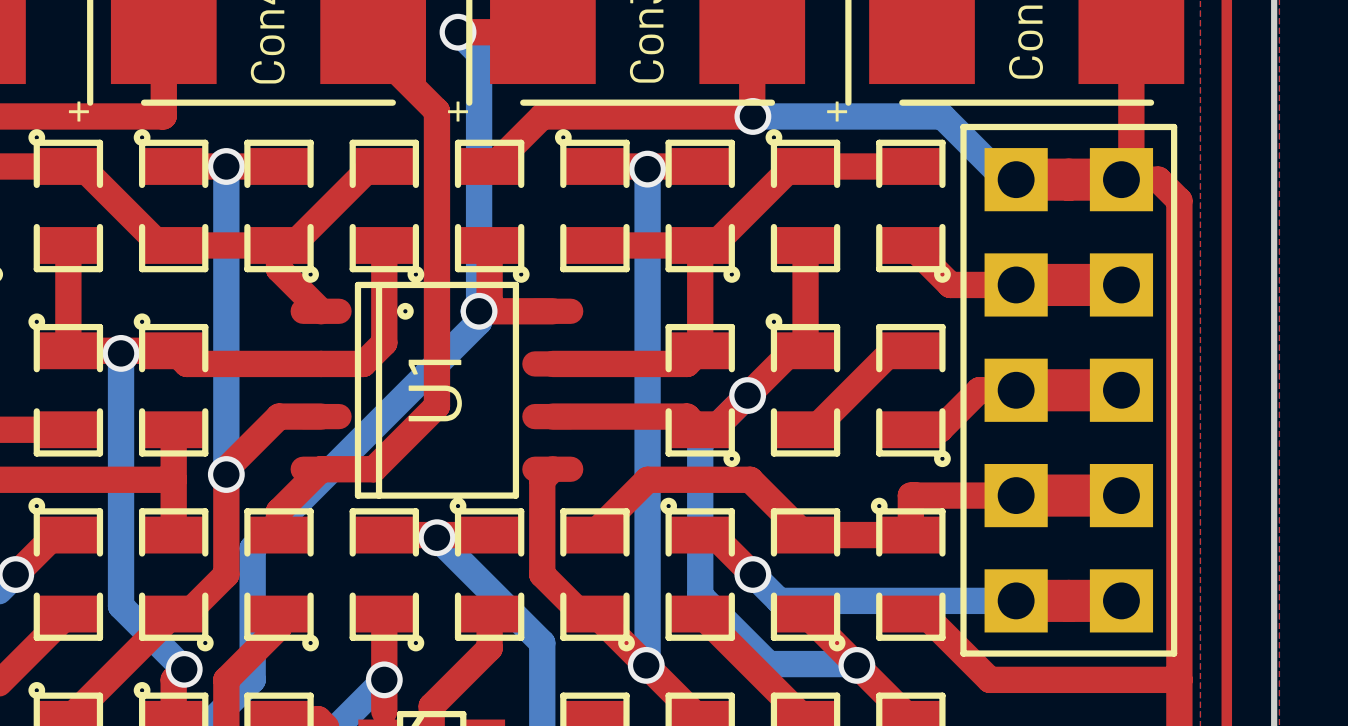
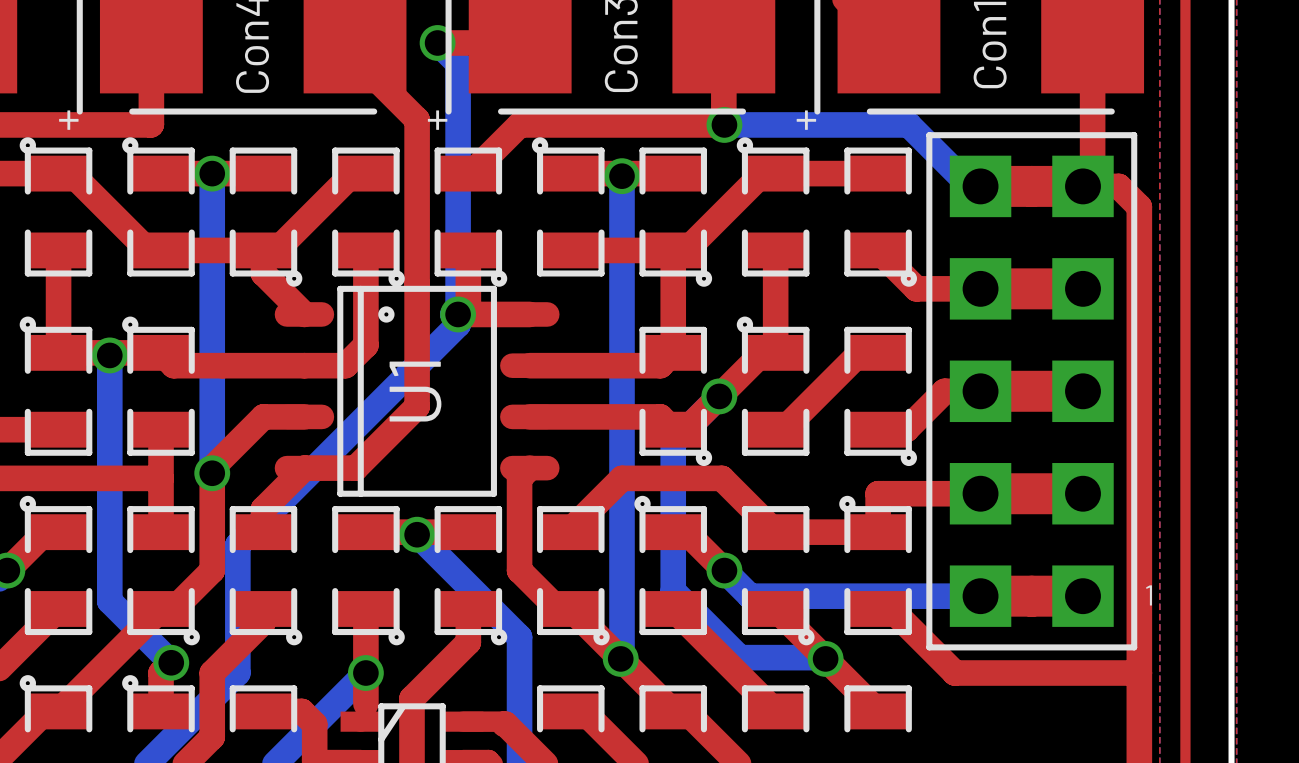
part rotation: 0° (486, 569) -> 180° (470, 575)
part text: none -> 1 (1149, 595)

